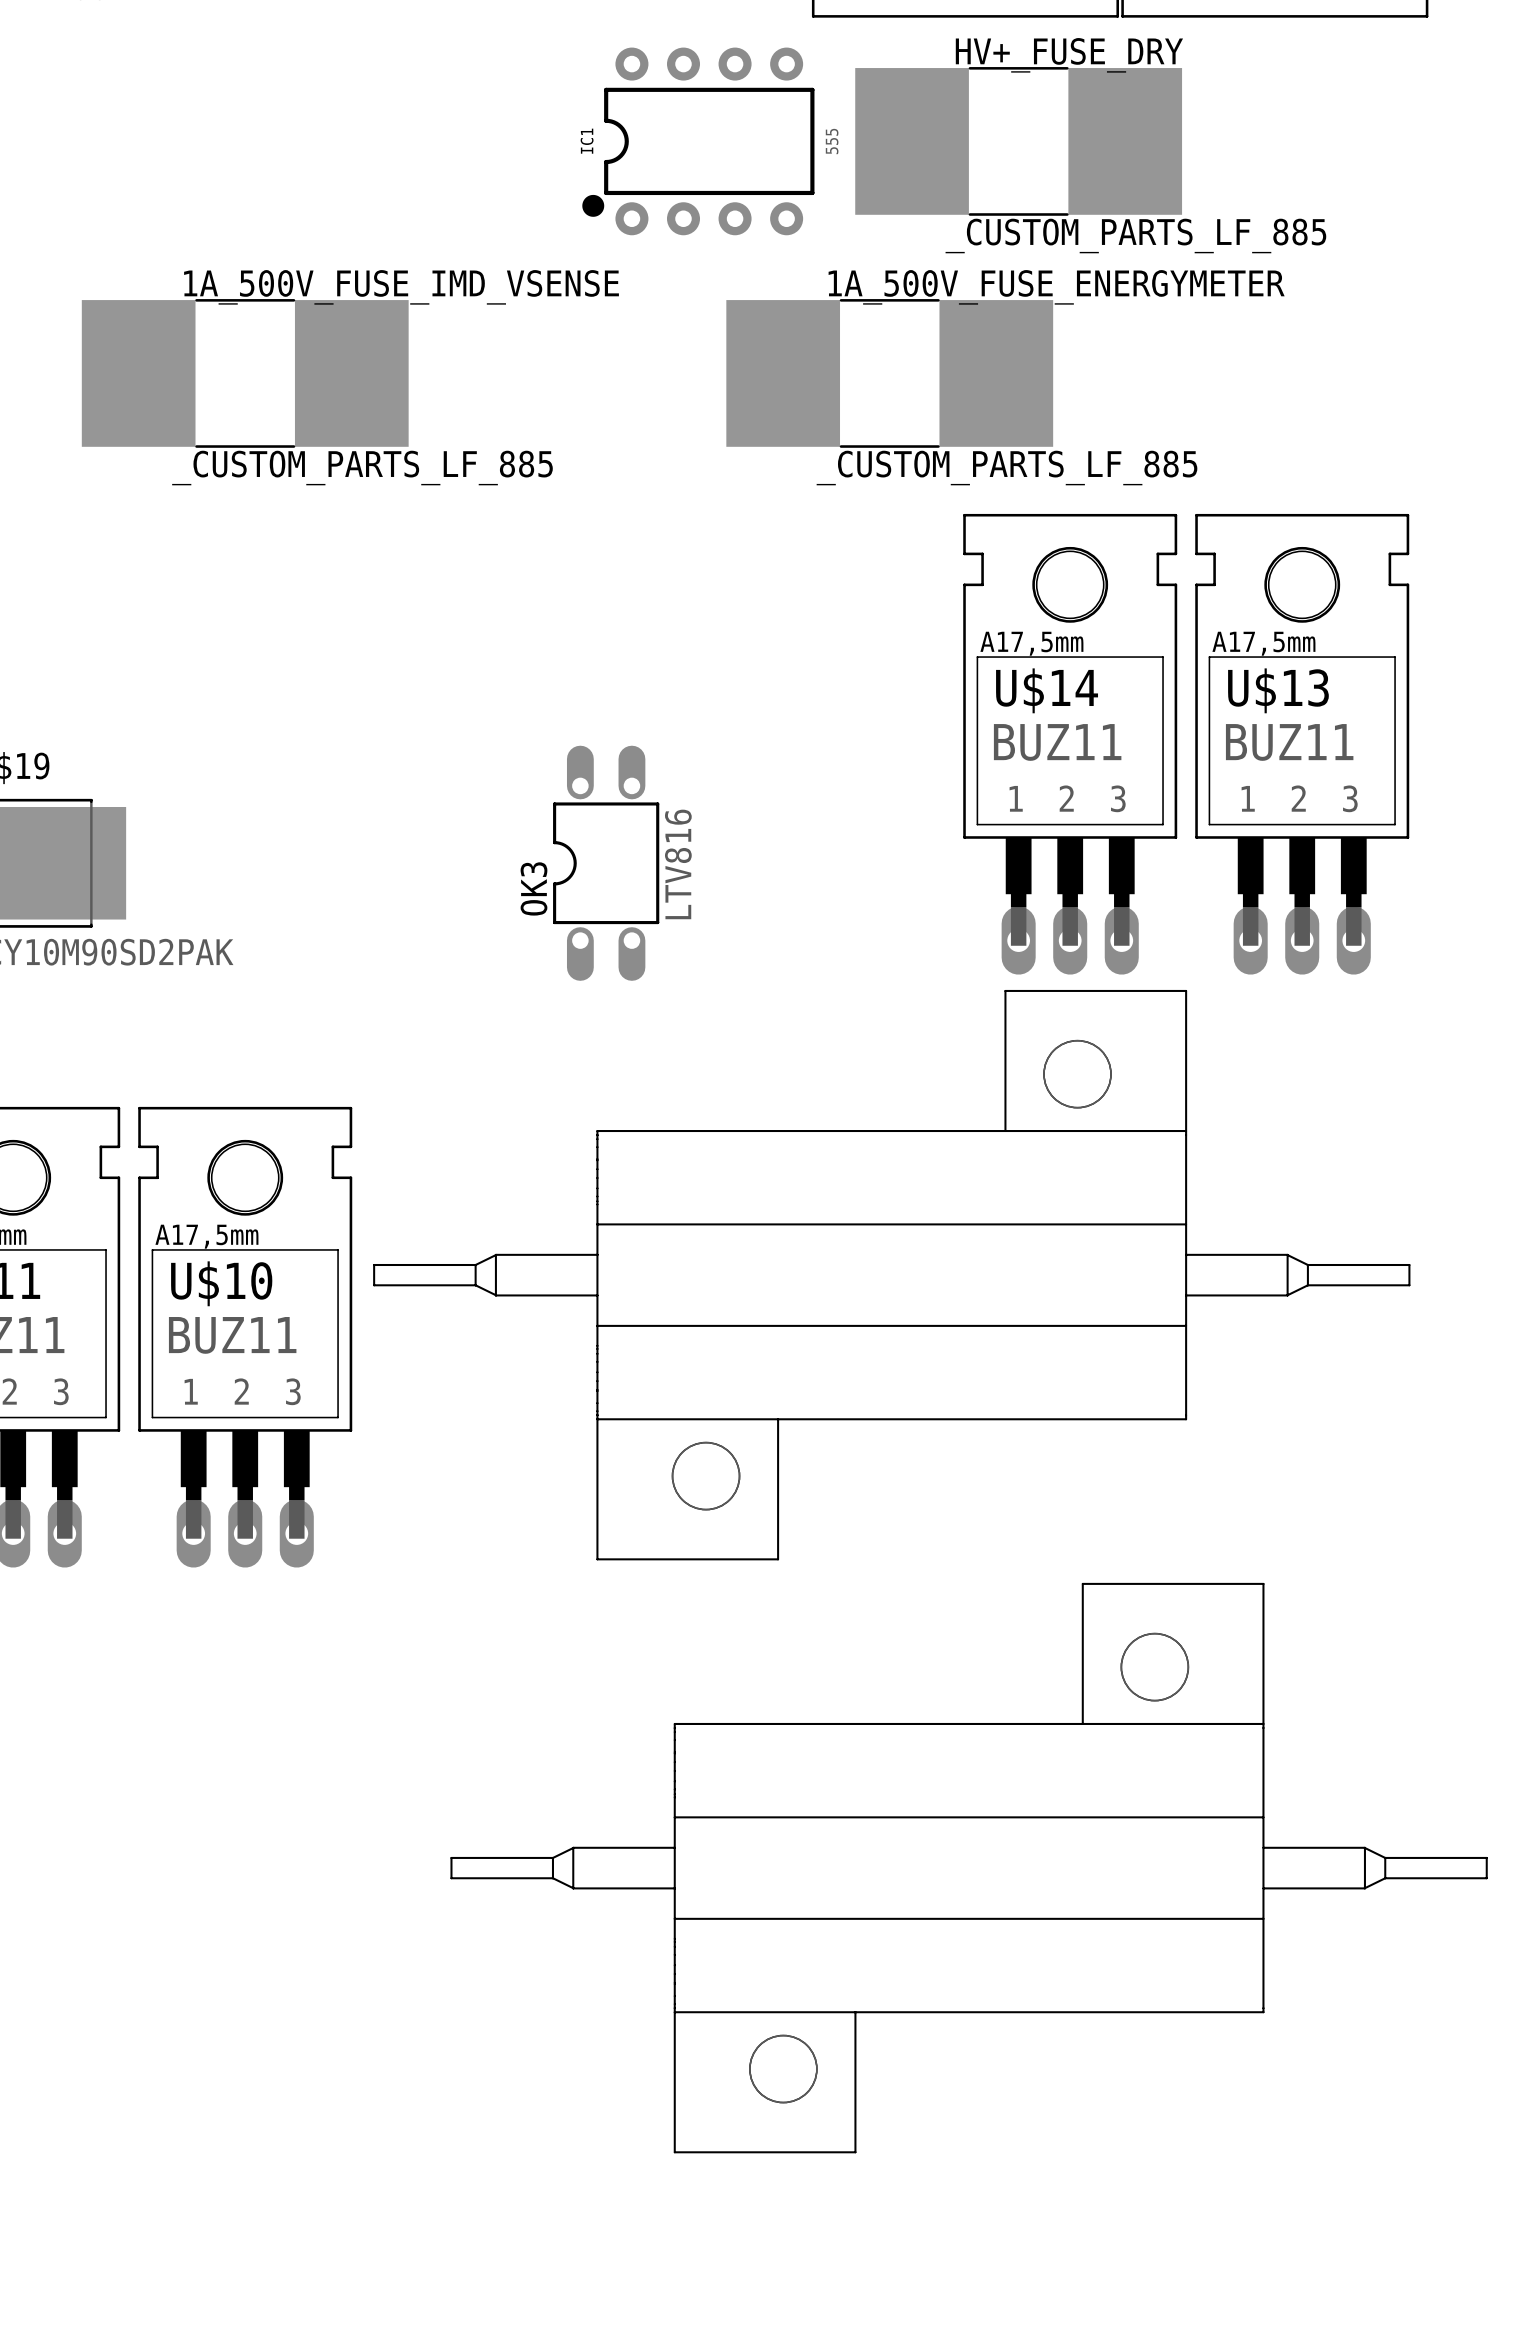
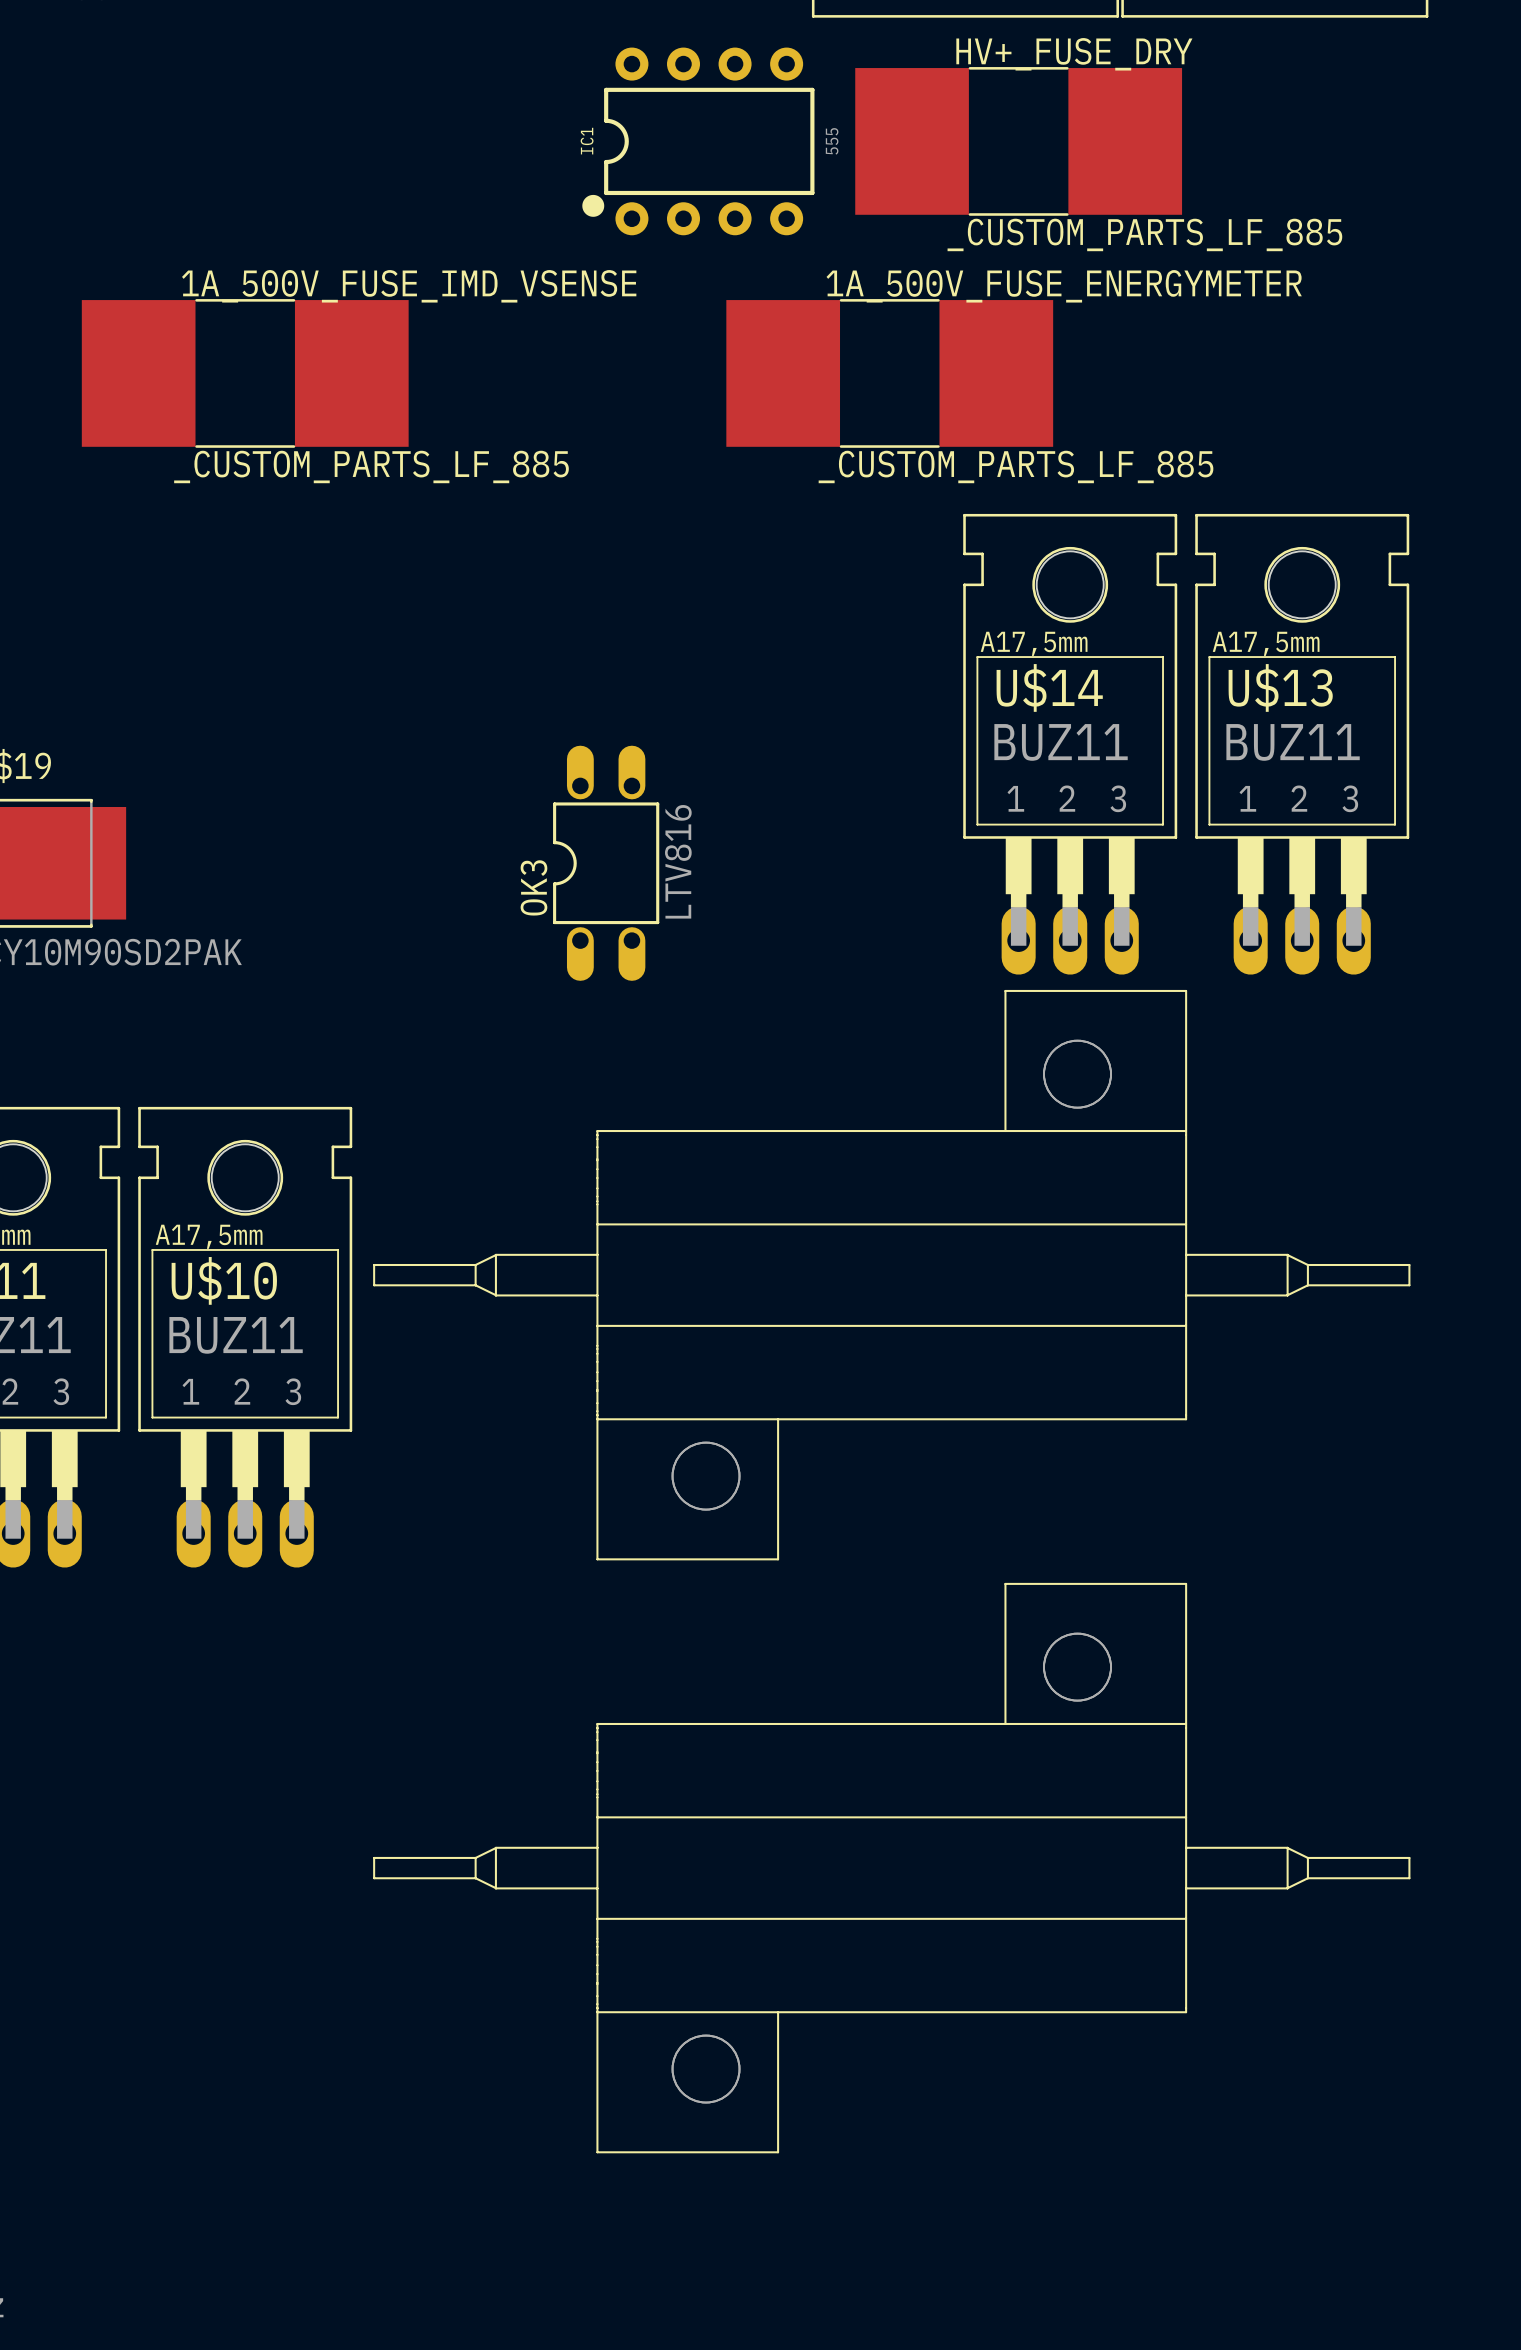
part position: (969, 1868) -> (891, 1868)

